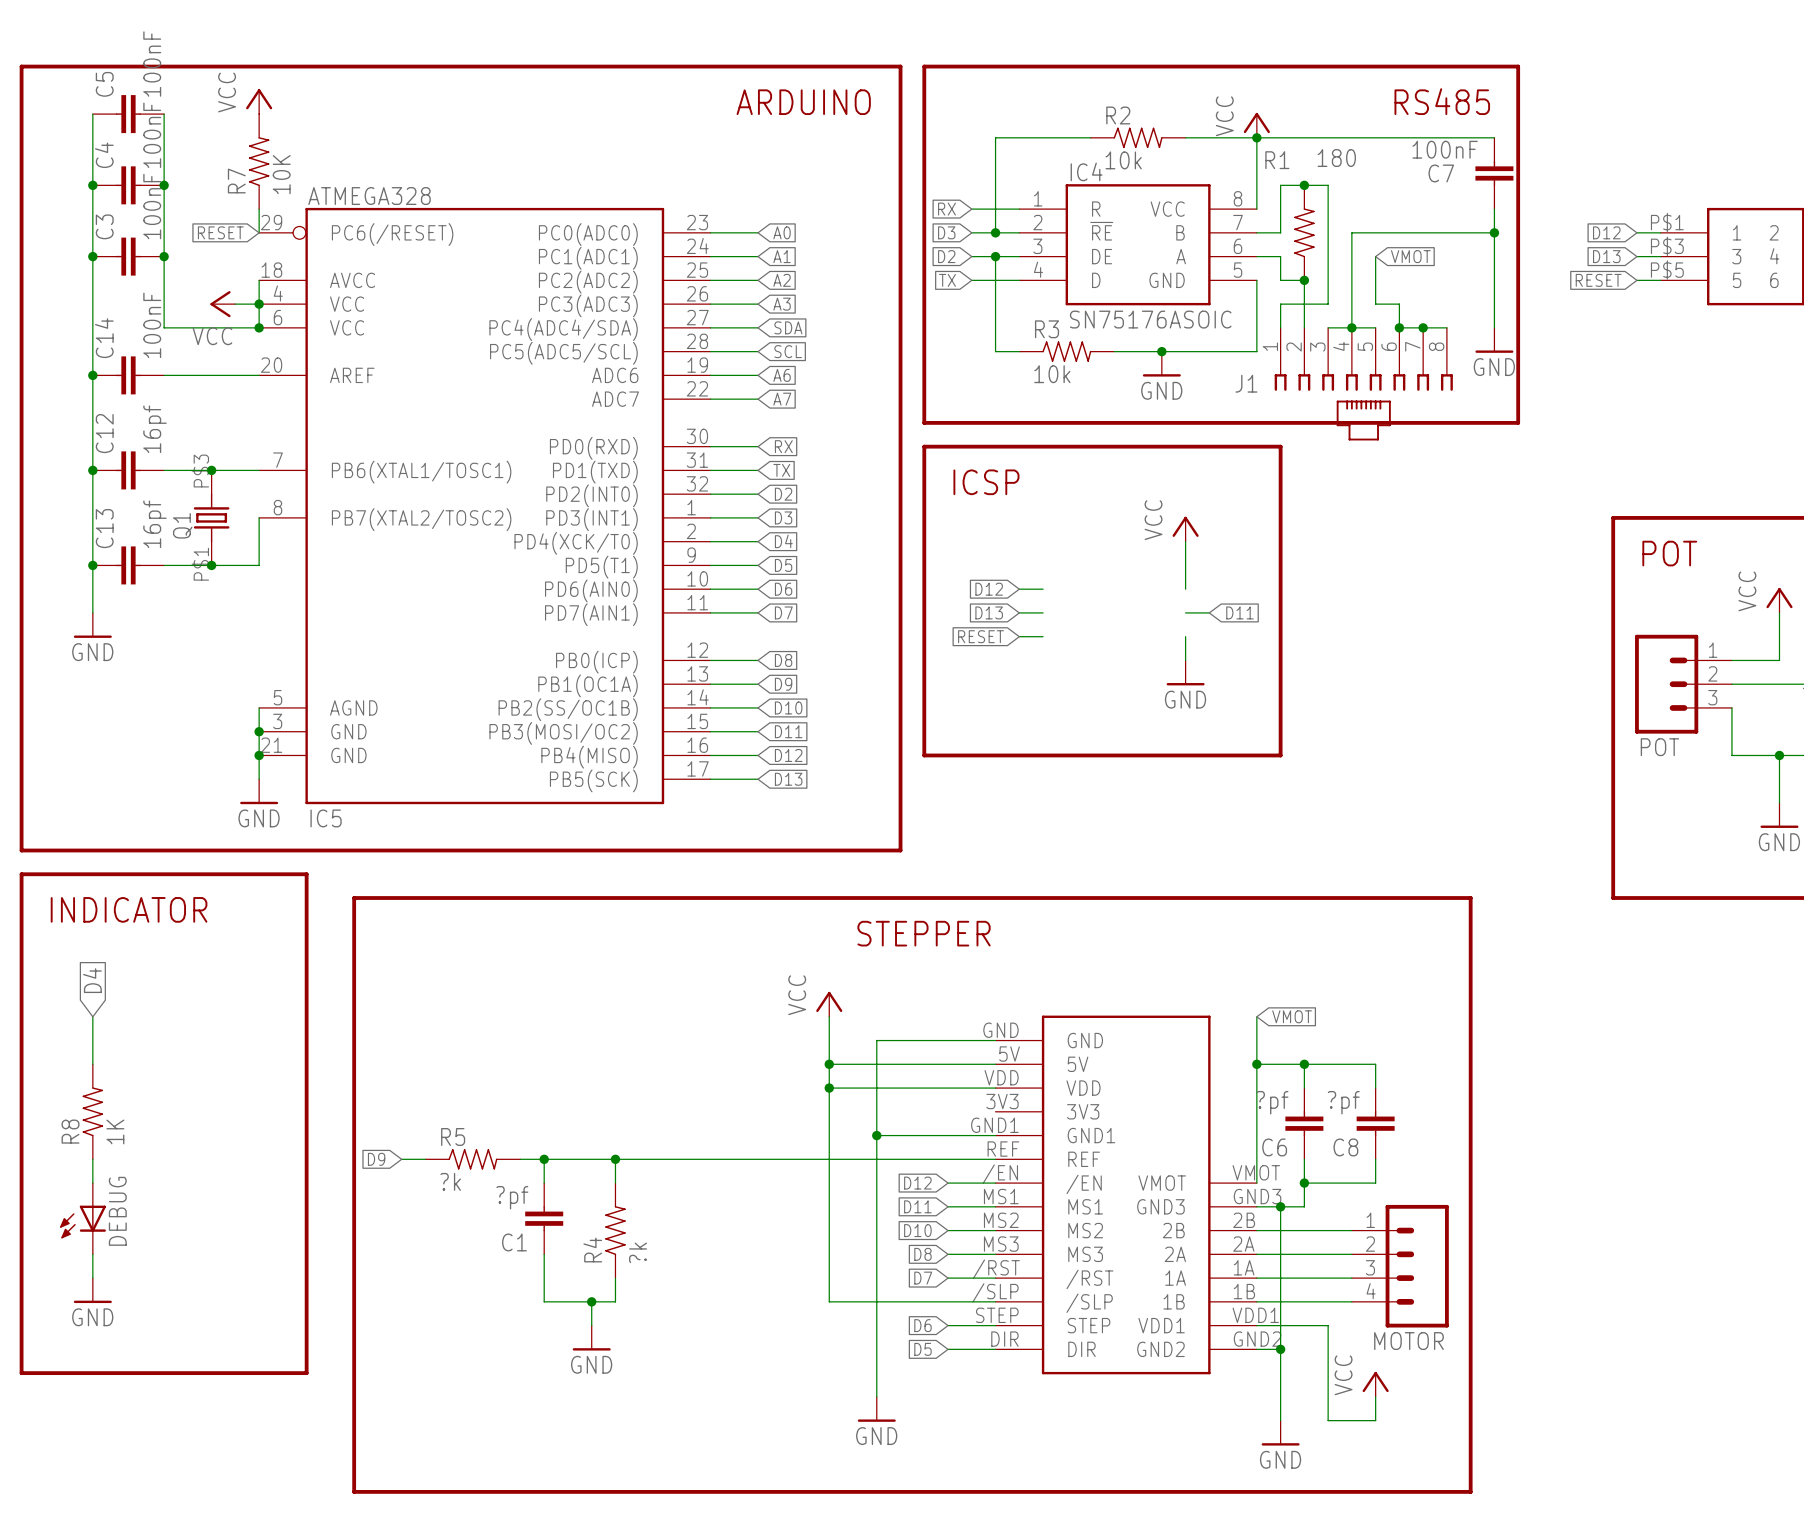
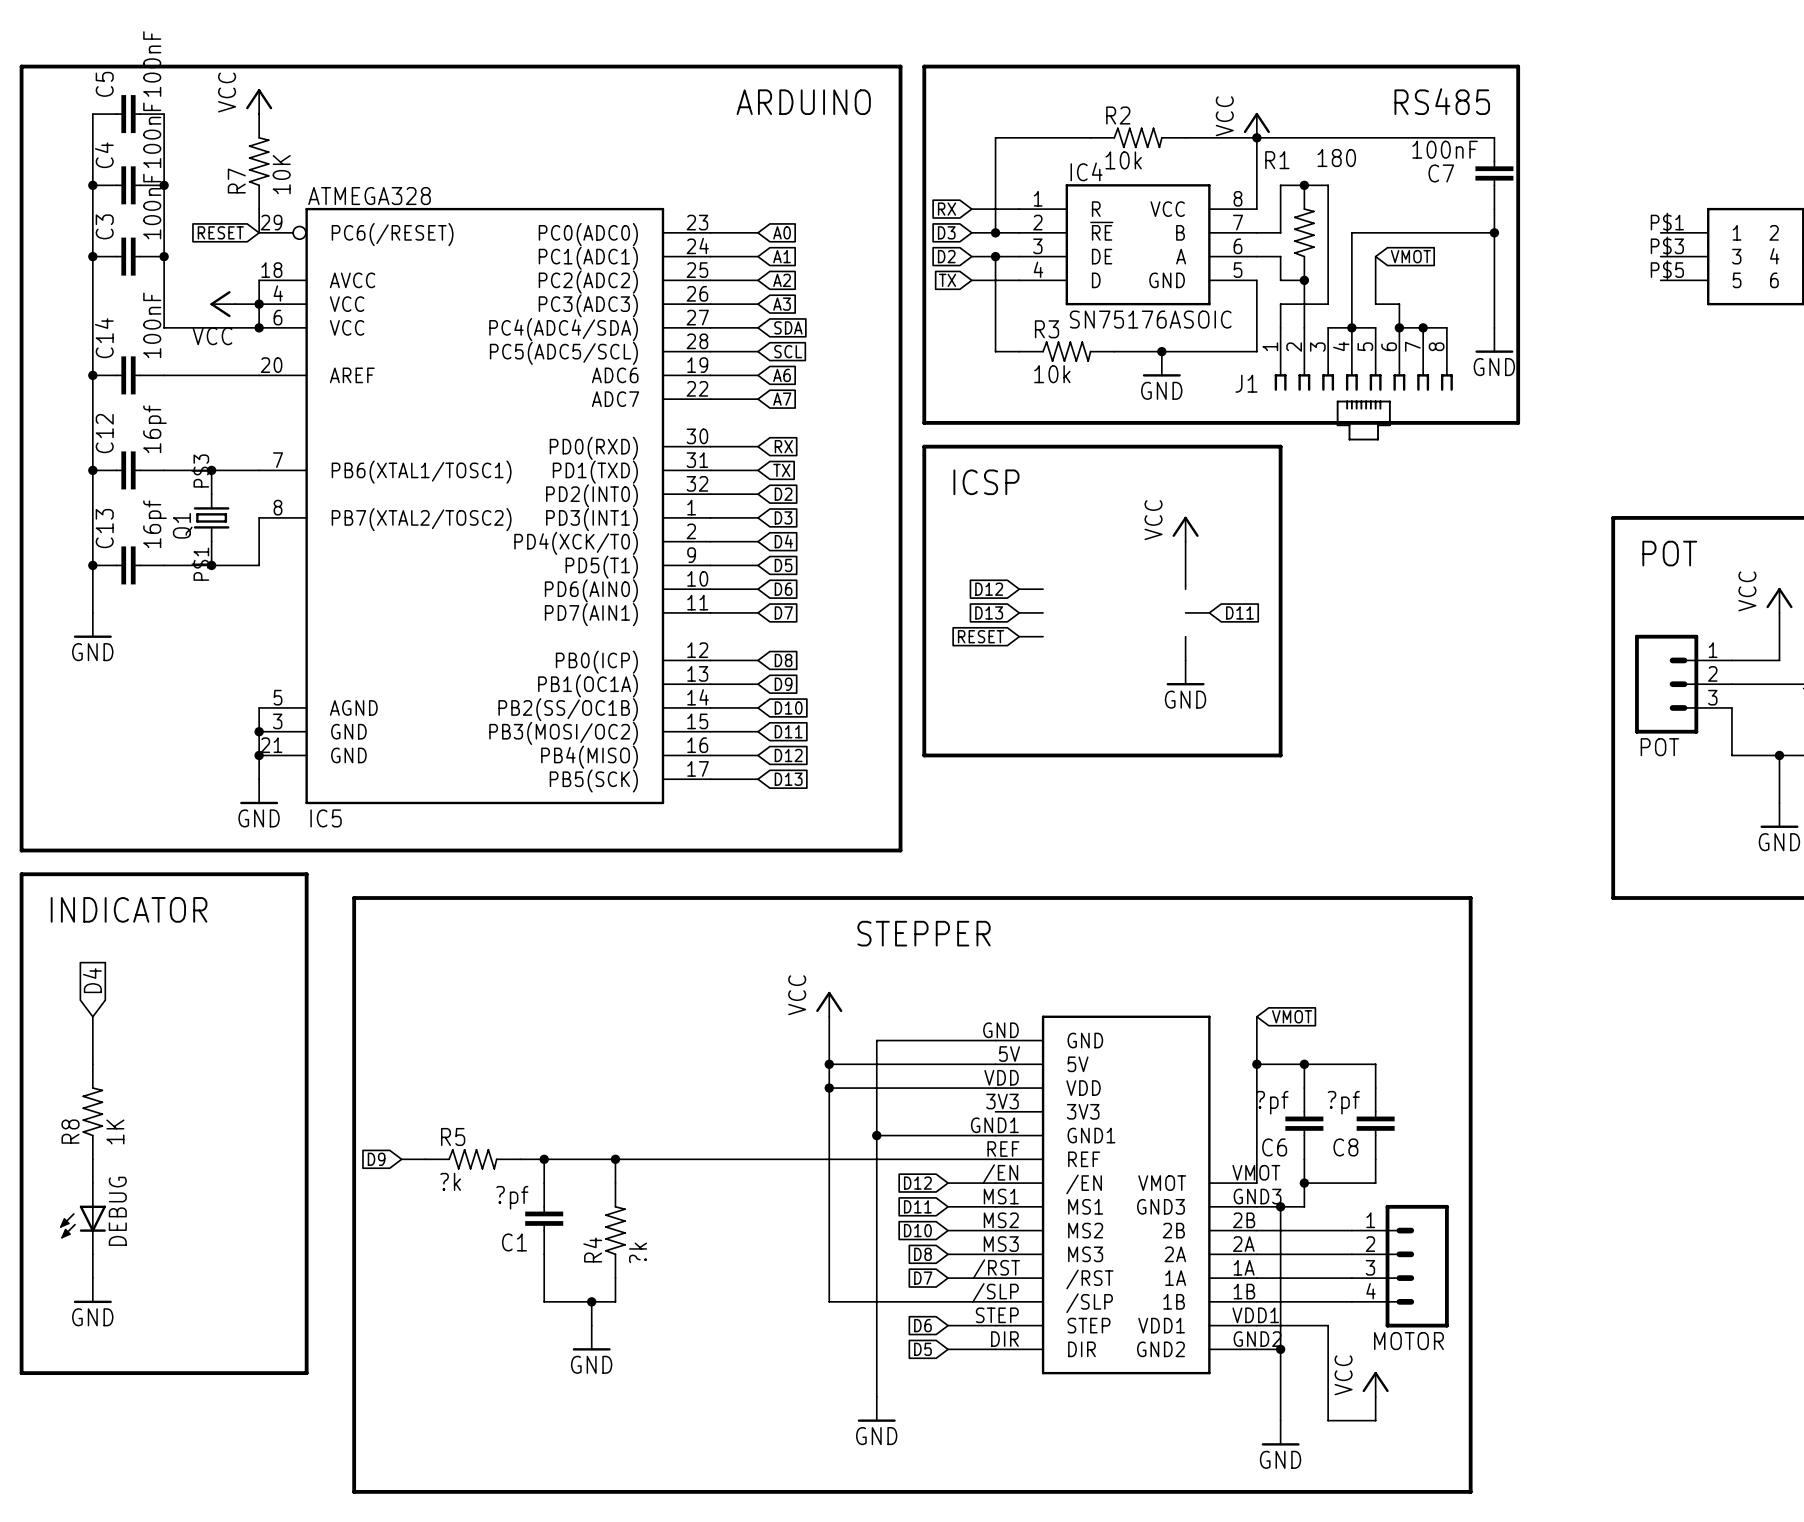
global label: D12 (1606, 232) -> none
wire: (1636, 232) (1660, 232) -> none
global label: D13 (1606, 256) -> none
wire: (1636, 256) (1660, 256) -> none
global label: RESET (1598, 280) -> none
wire: (1636, 280) (1660, 280) -> none

